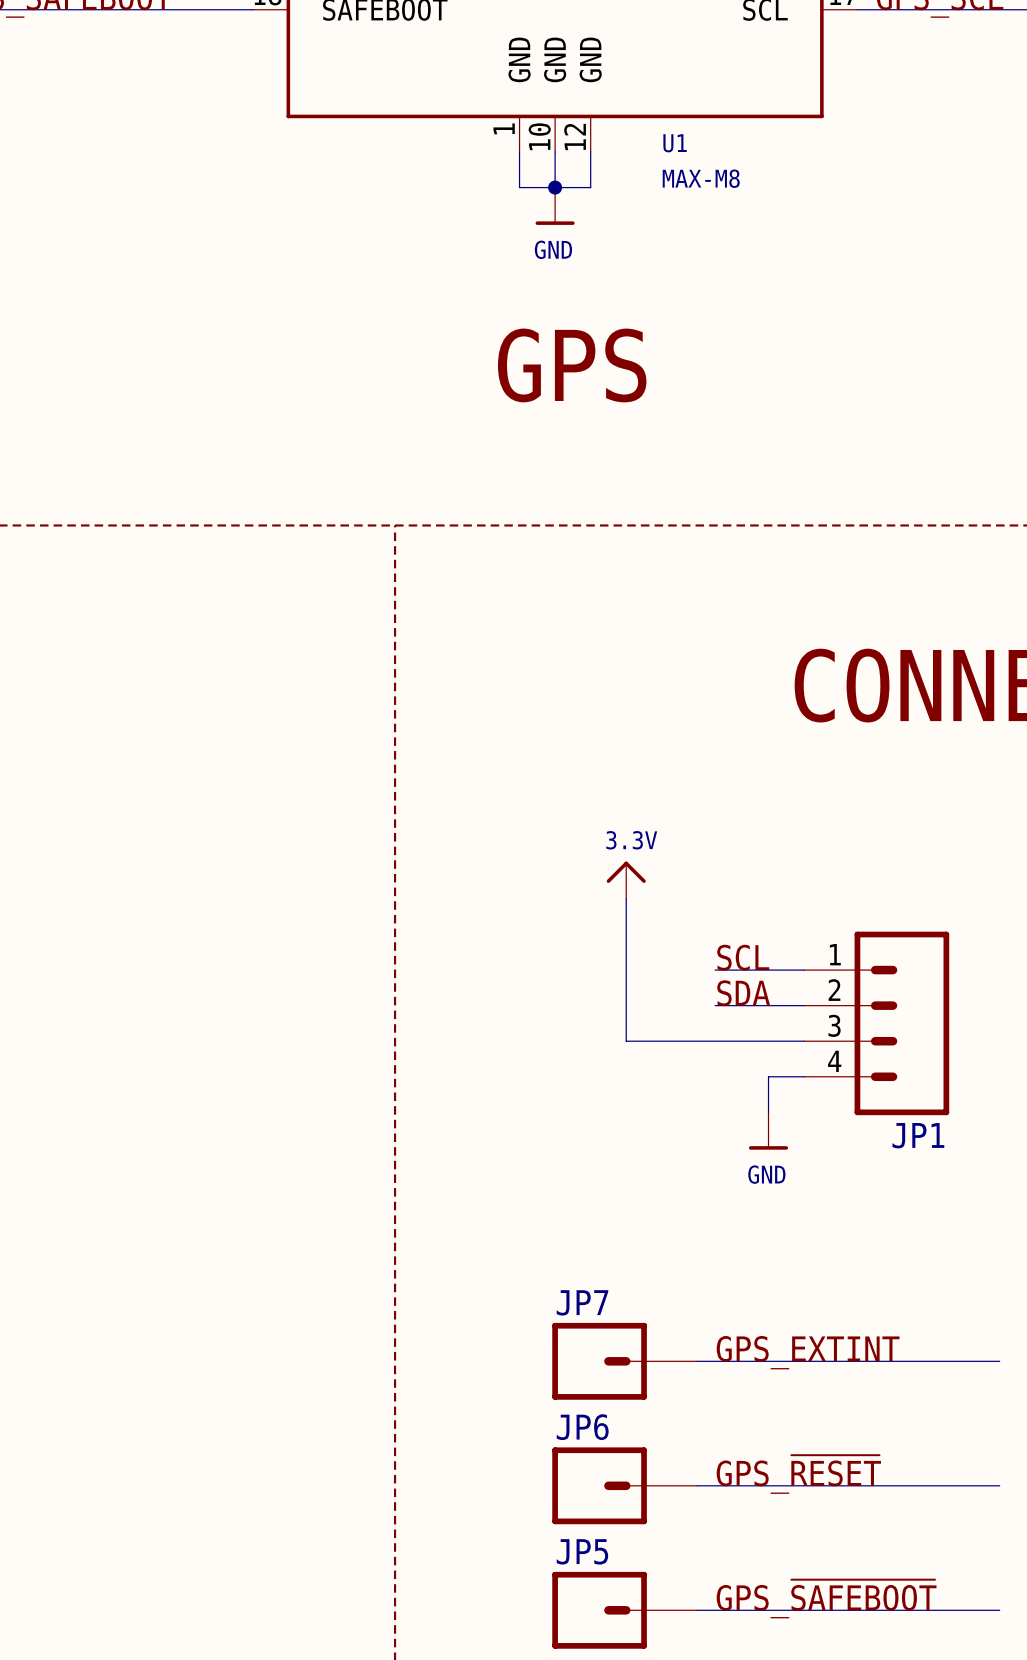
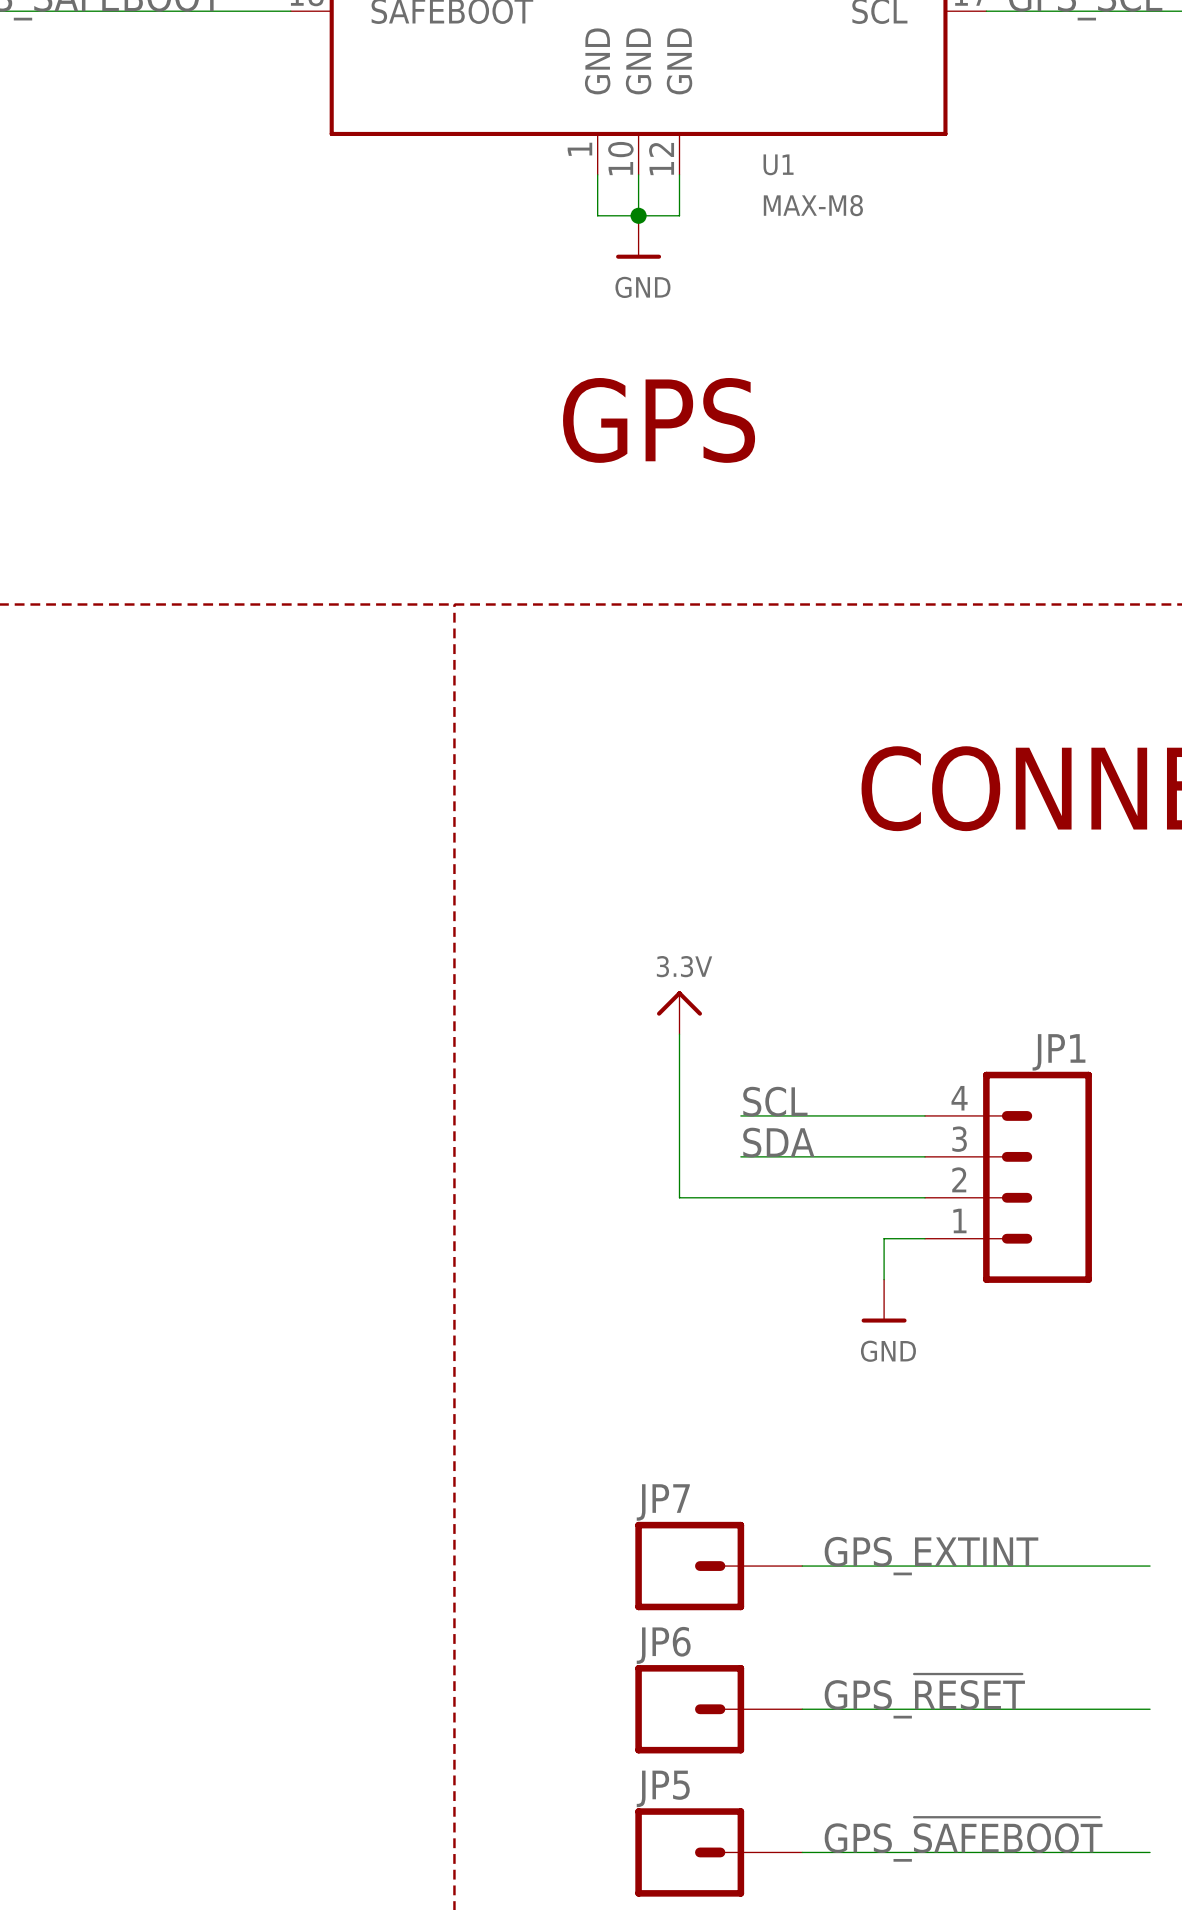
power symbol position: 3.3V (626, 880) -> 3.3V (679, 1012)
wire: (626, 898) (626, 1041) -> (679, 1034) (679, 1197) (720, 1197)
label position: SCL (743, 957) -> SCL (775, 1101)
wire: none -> (740, 1115) (822, 1115)
label position: SDA (743, 993) -> SDA (778, 1142)
wire: none -> (740, 1156) (822, 1156)
JP1 flip: as is (901, 1023) -> up-down (1037, 1177)

